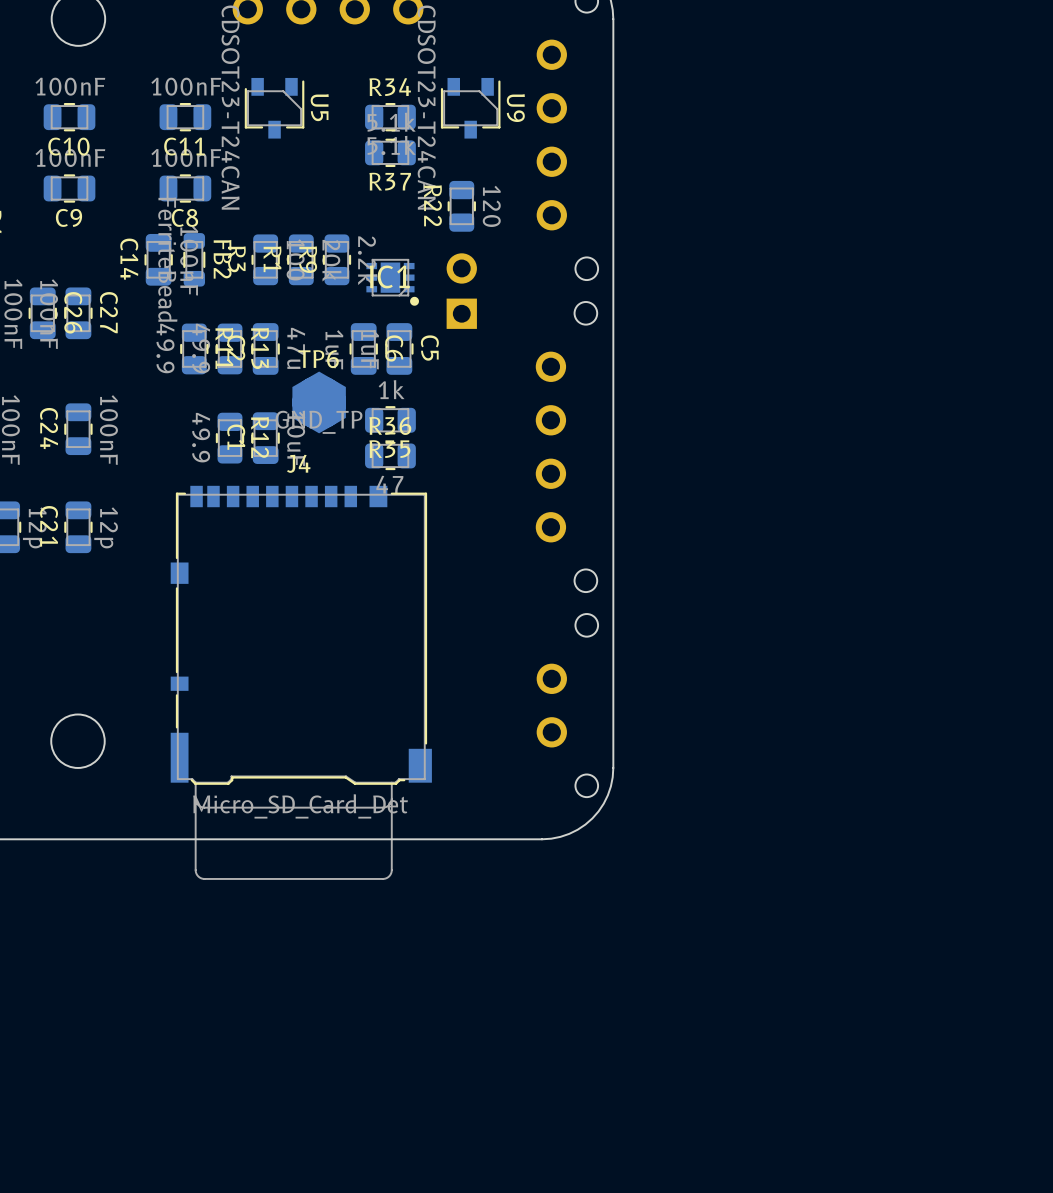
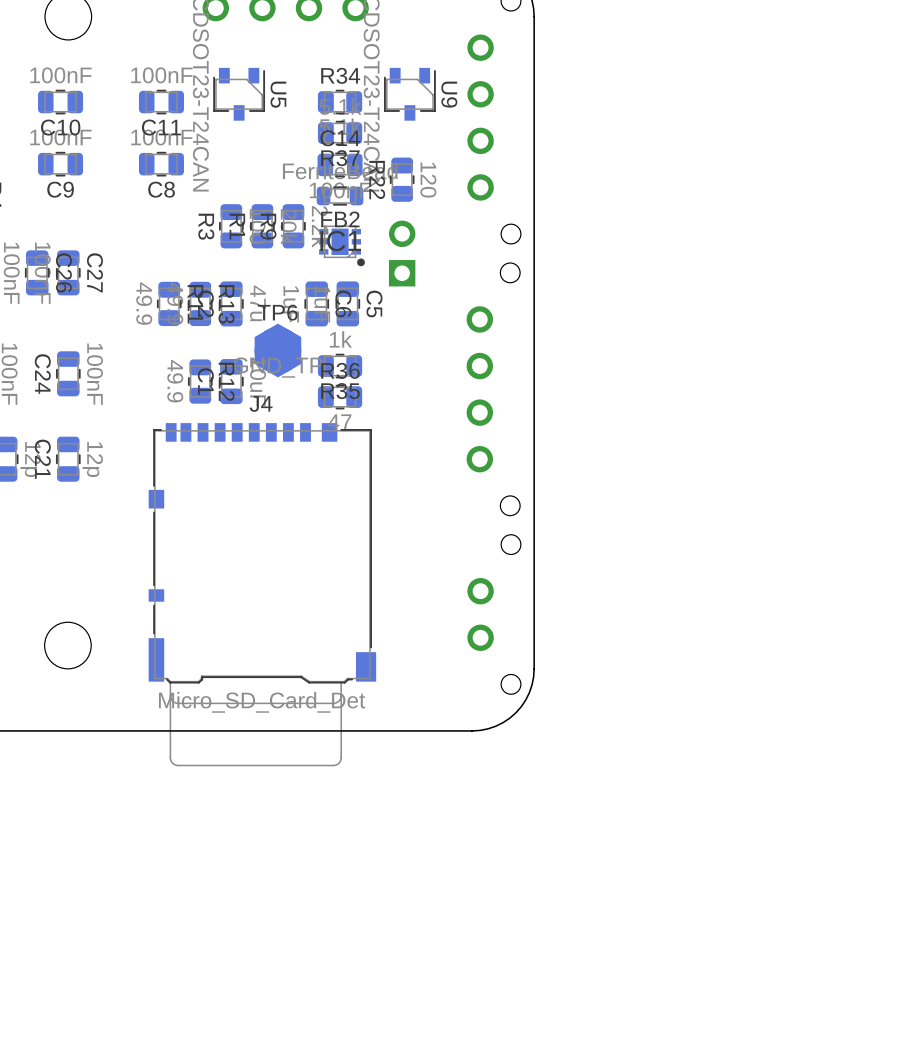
C14 rotation: 0° (158, 259) -> 90° clockwise (340, 164)
C14 position: (158, 259) -> (340, 164)
FB2 rotation: 0° (194, 259) -> 90° clockwise (340, 195)
FB2 position: (194, 259) -> (340, 195)

